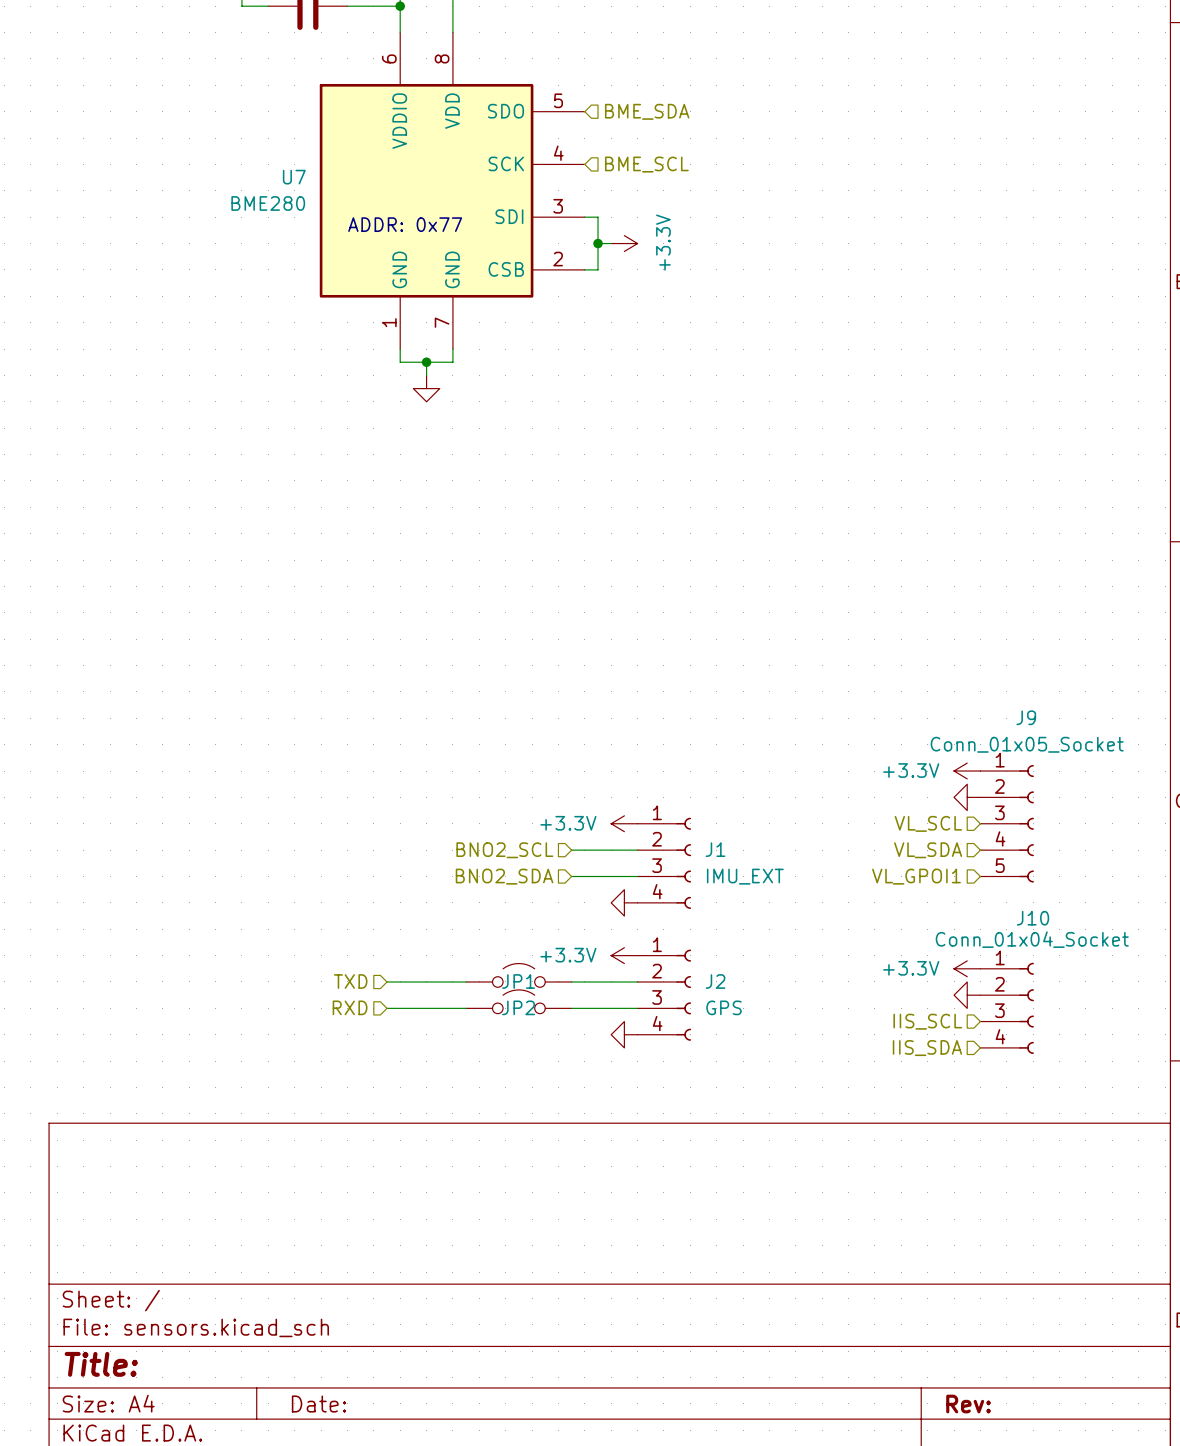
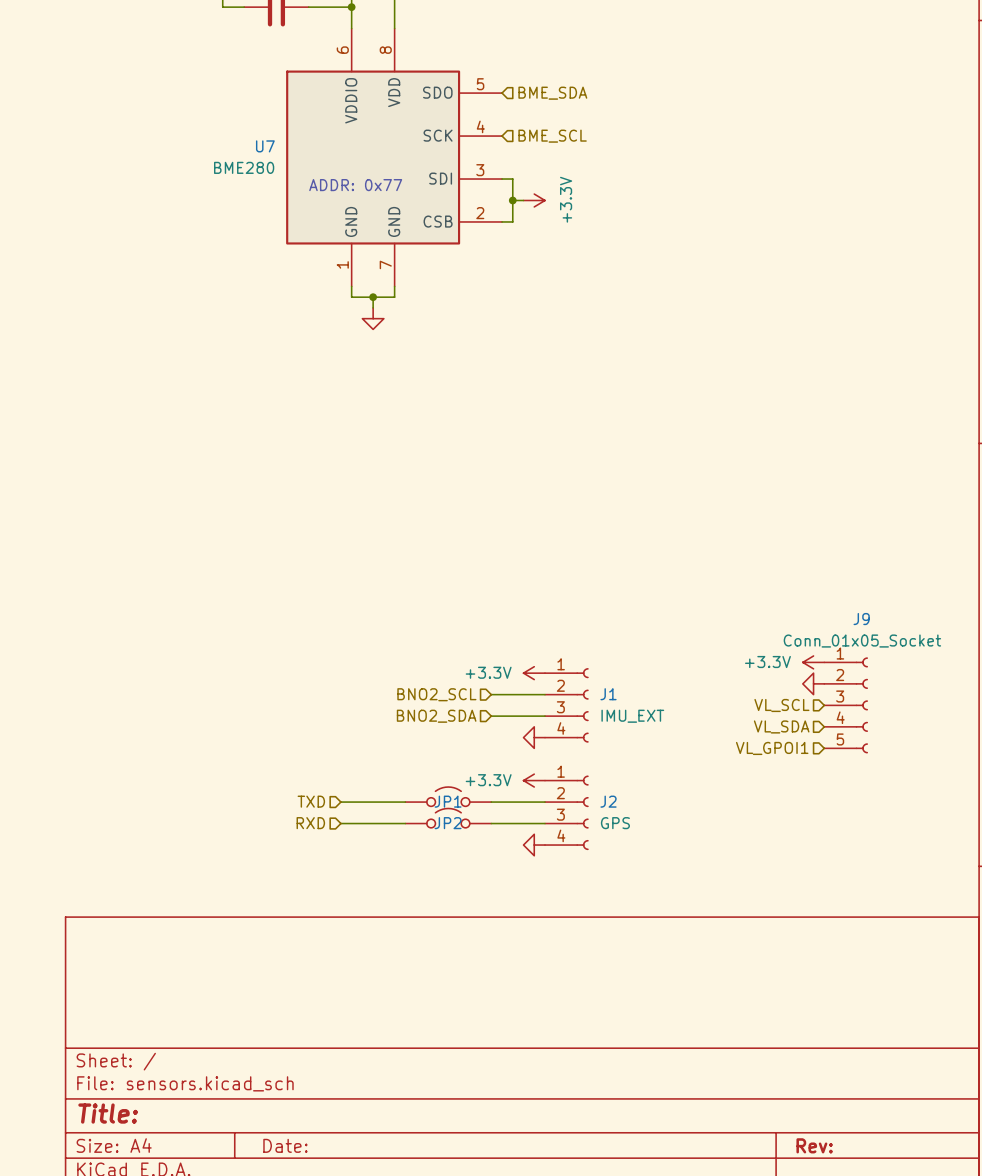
power symbol position: +3.3V (967, 771) -> +3.3V (813, 662)
power symbol position: (967, 797) -> (813, 683)
hierarchical label position: VL_SCL (928, 823) -> VL_SCL (781, 705)
J9 position: (1007, 823) -> (846, 705)
hierarchical label position: VL_SDA (928, 850) -> VL_SDA (781, 726)
hierarchical label position: VL_GPOI1 (916, 876) -> VL_GPOI1 (772, 748)
power symbol: +3.3V (967, 968) -> none
power symbol: (967, 995) -> none
J10: Conn_01x04_Socket (1007, 1008) -> none
hierarchical label: IIS_SCL (927, 1021) -> none
hierarchical label: IIS_SDA (927, 1048) -> none

